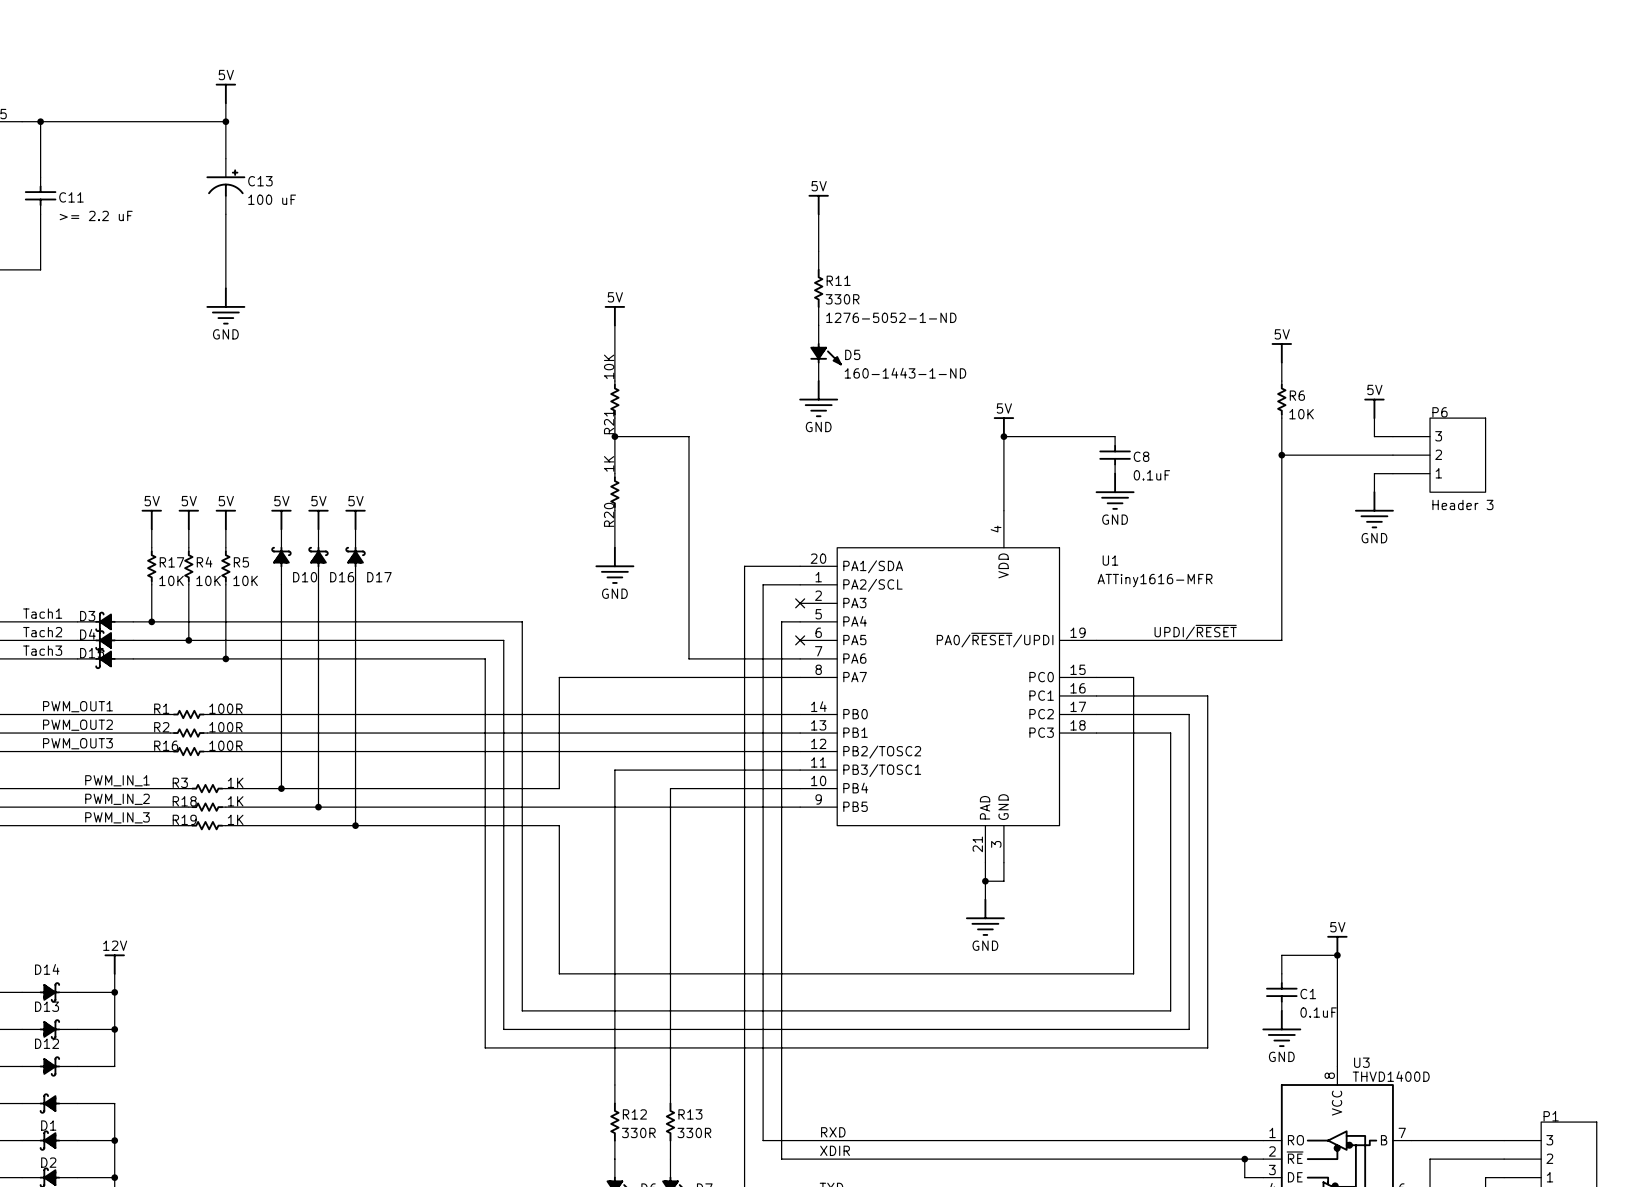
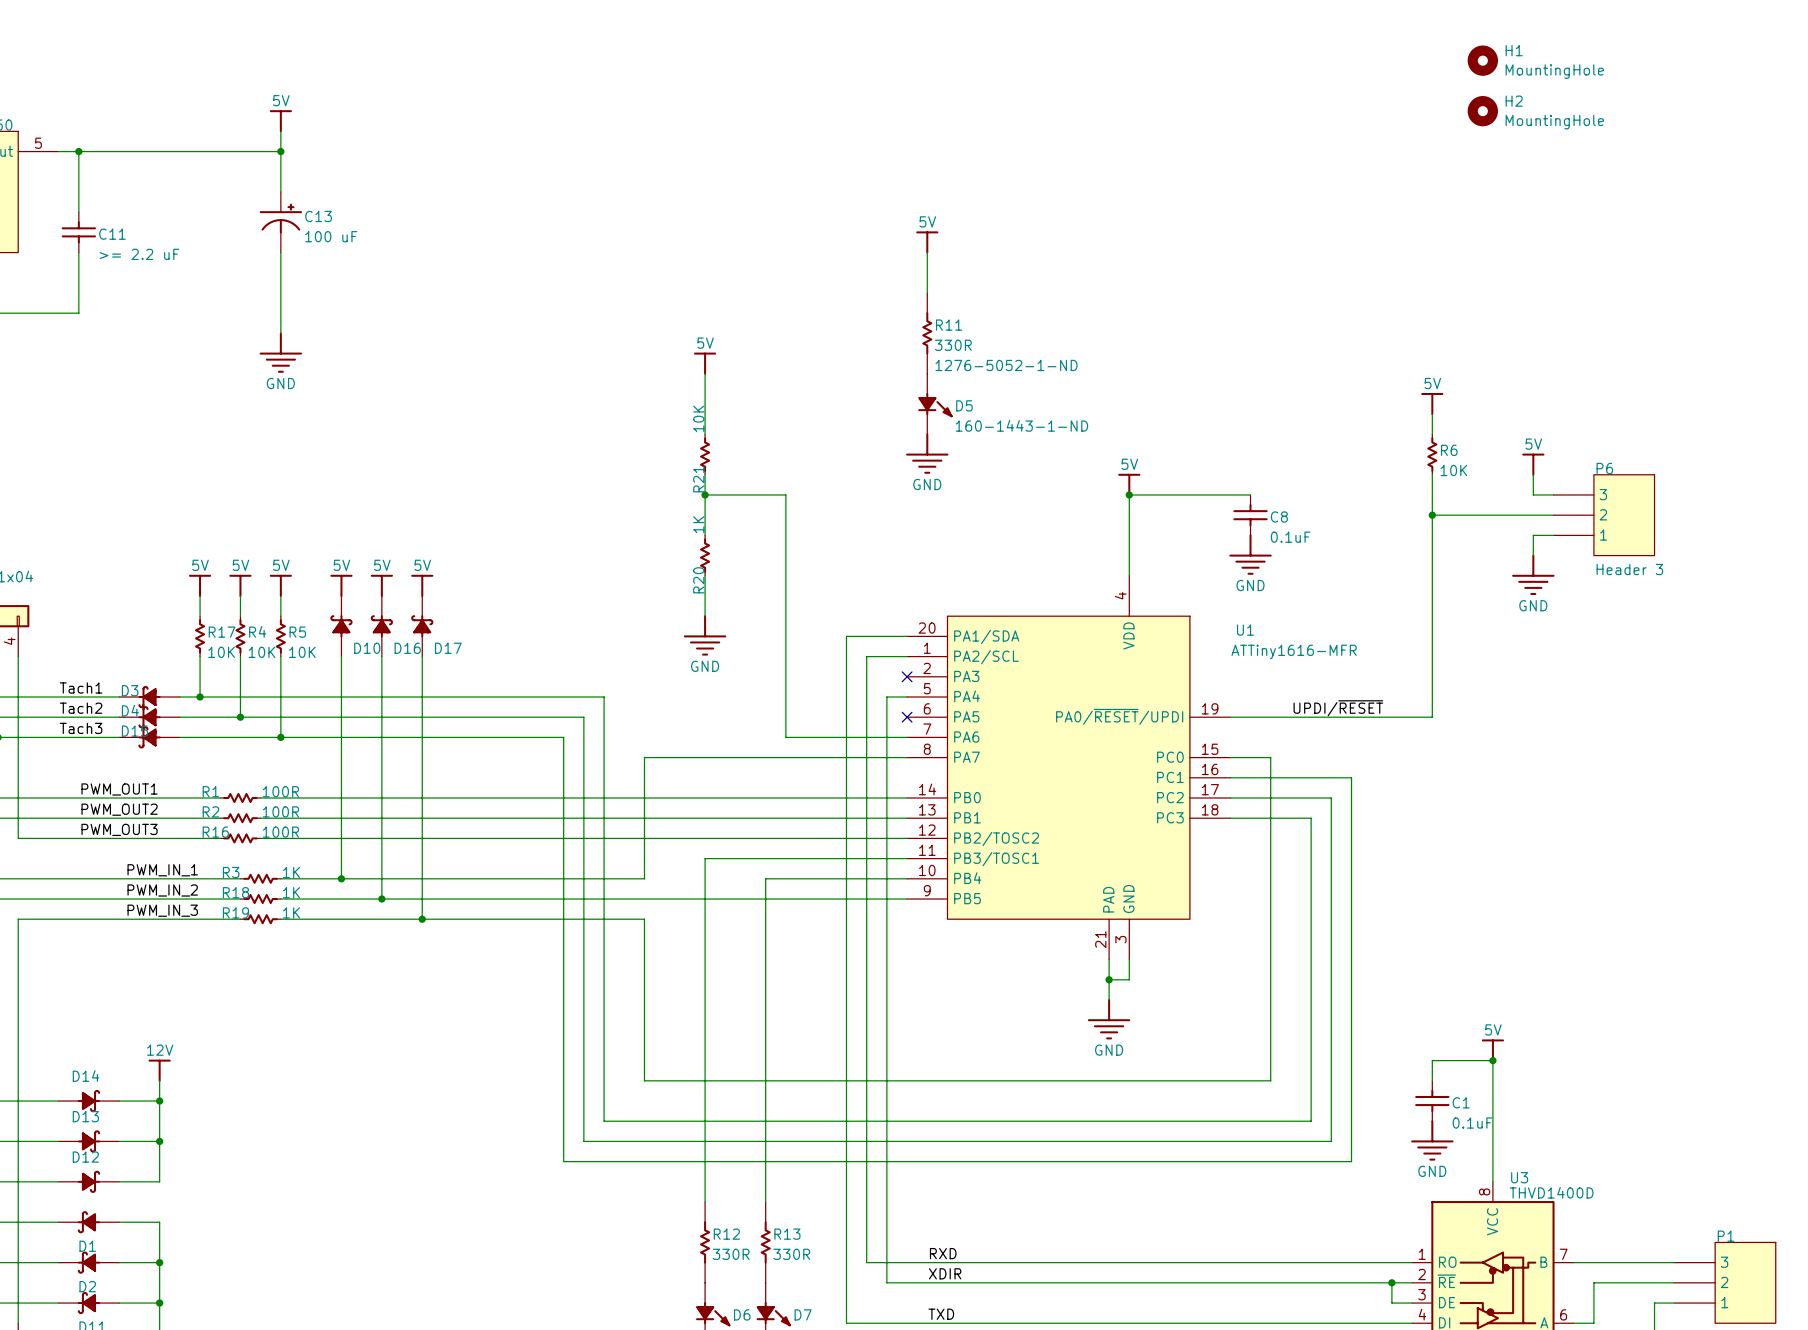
H1: none -> MountingHole (1482, 60)
H2: none -> MountingHole (1482, 111)

